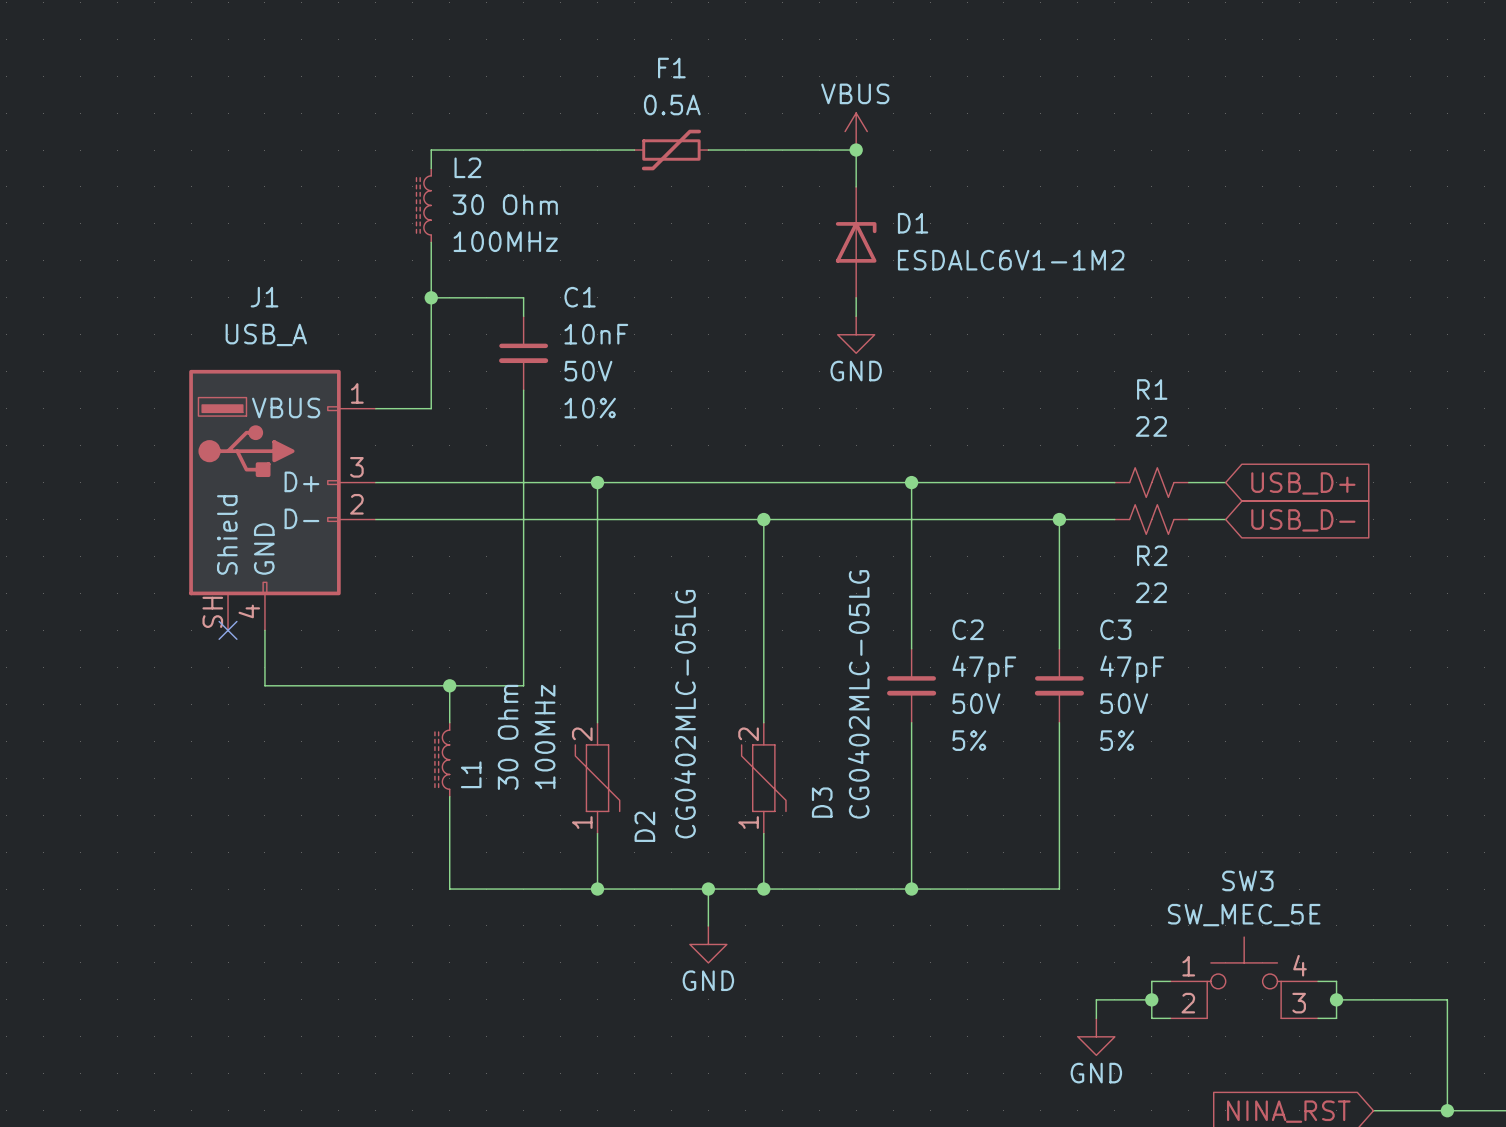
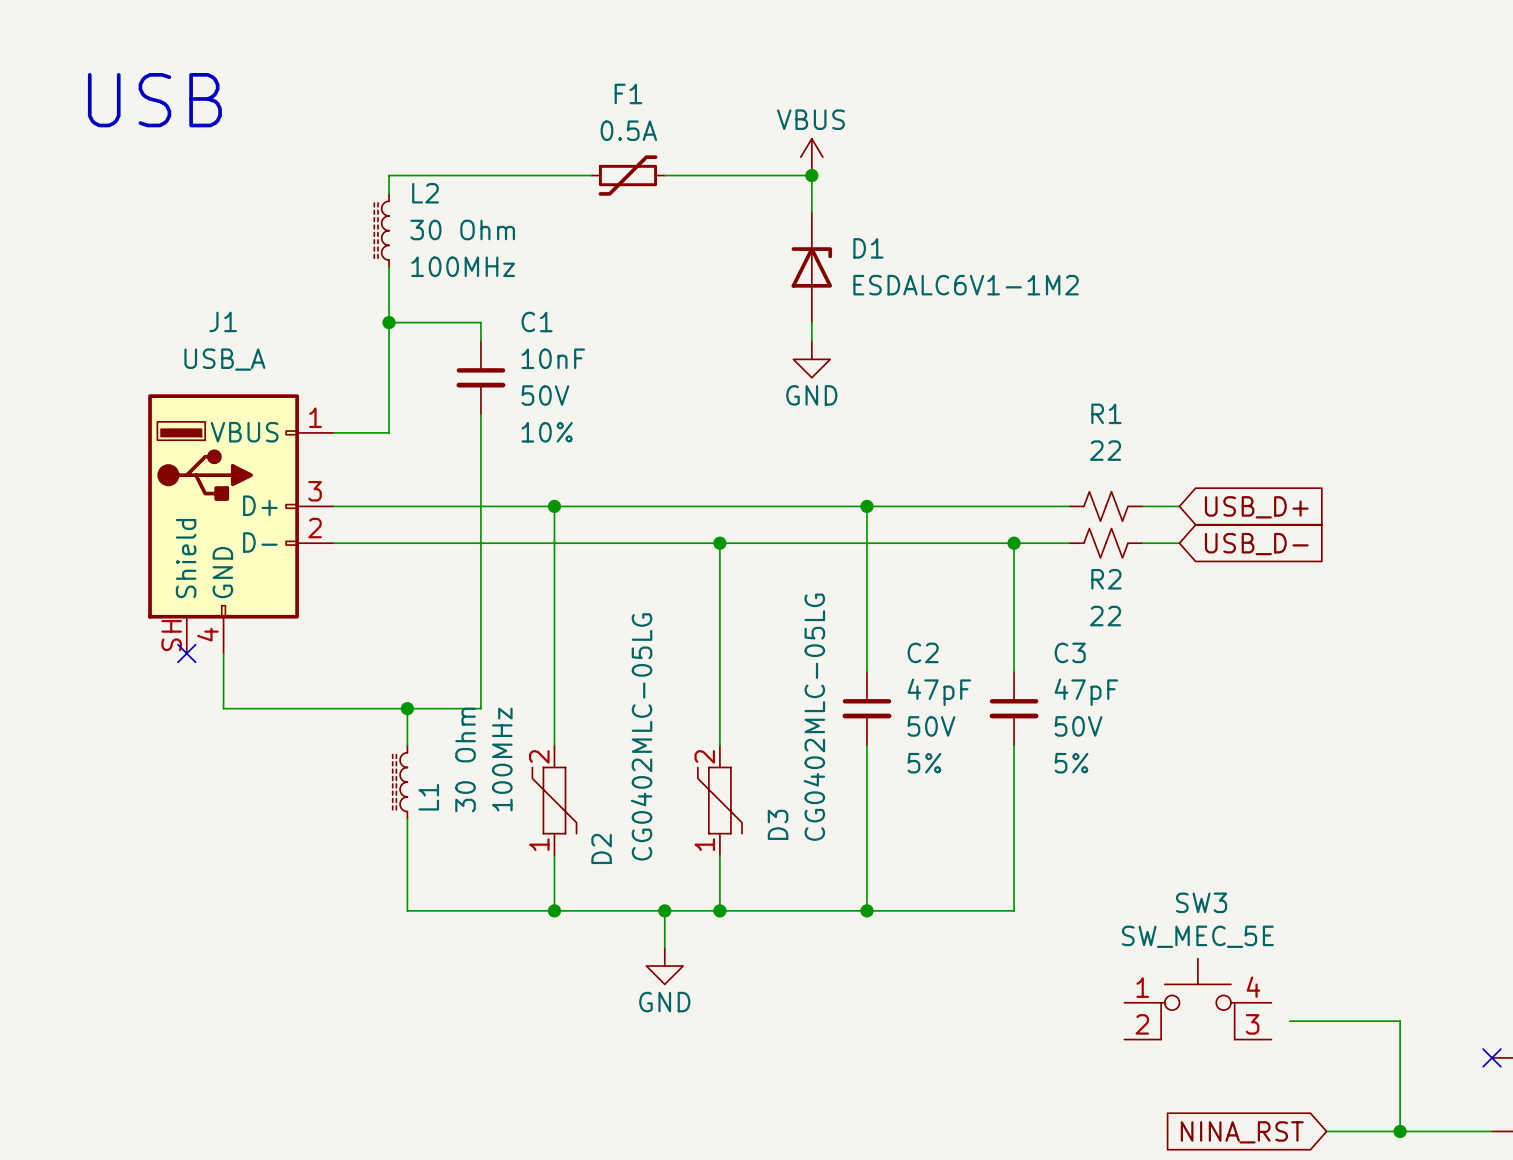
text: none -> USB (154, 100)
wire: (1170, 981) (1151, 981) (1151, 1018) (1170, 1018) -> none
wire: (1318, 981) (1336, 981) (1336, 1018) (1318, 1018) -> none
wire: (1151, 999) (1096, 999) (1096, 1018) -> none
junction: (1151, 999) -> none
junction: (1336, 999) -> none
power symbol: GND (1096, 1036) -> none

